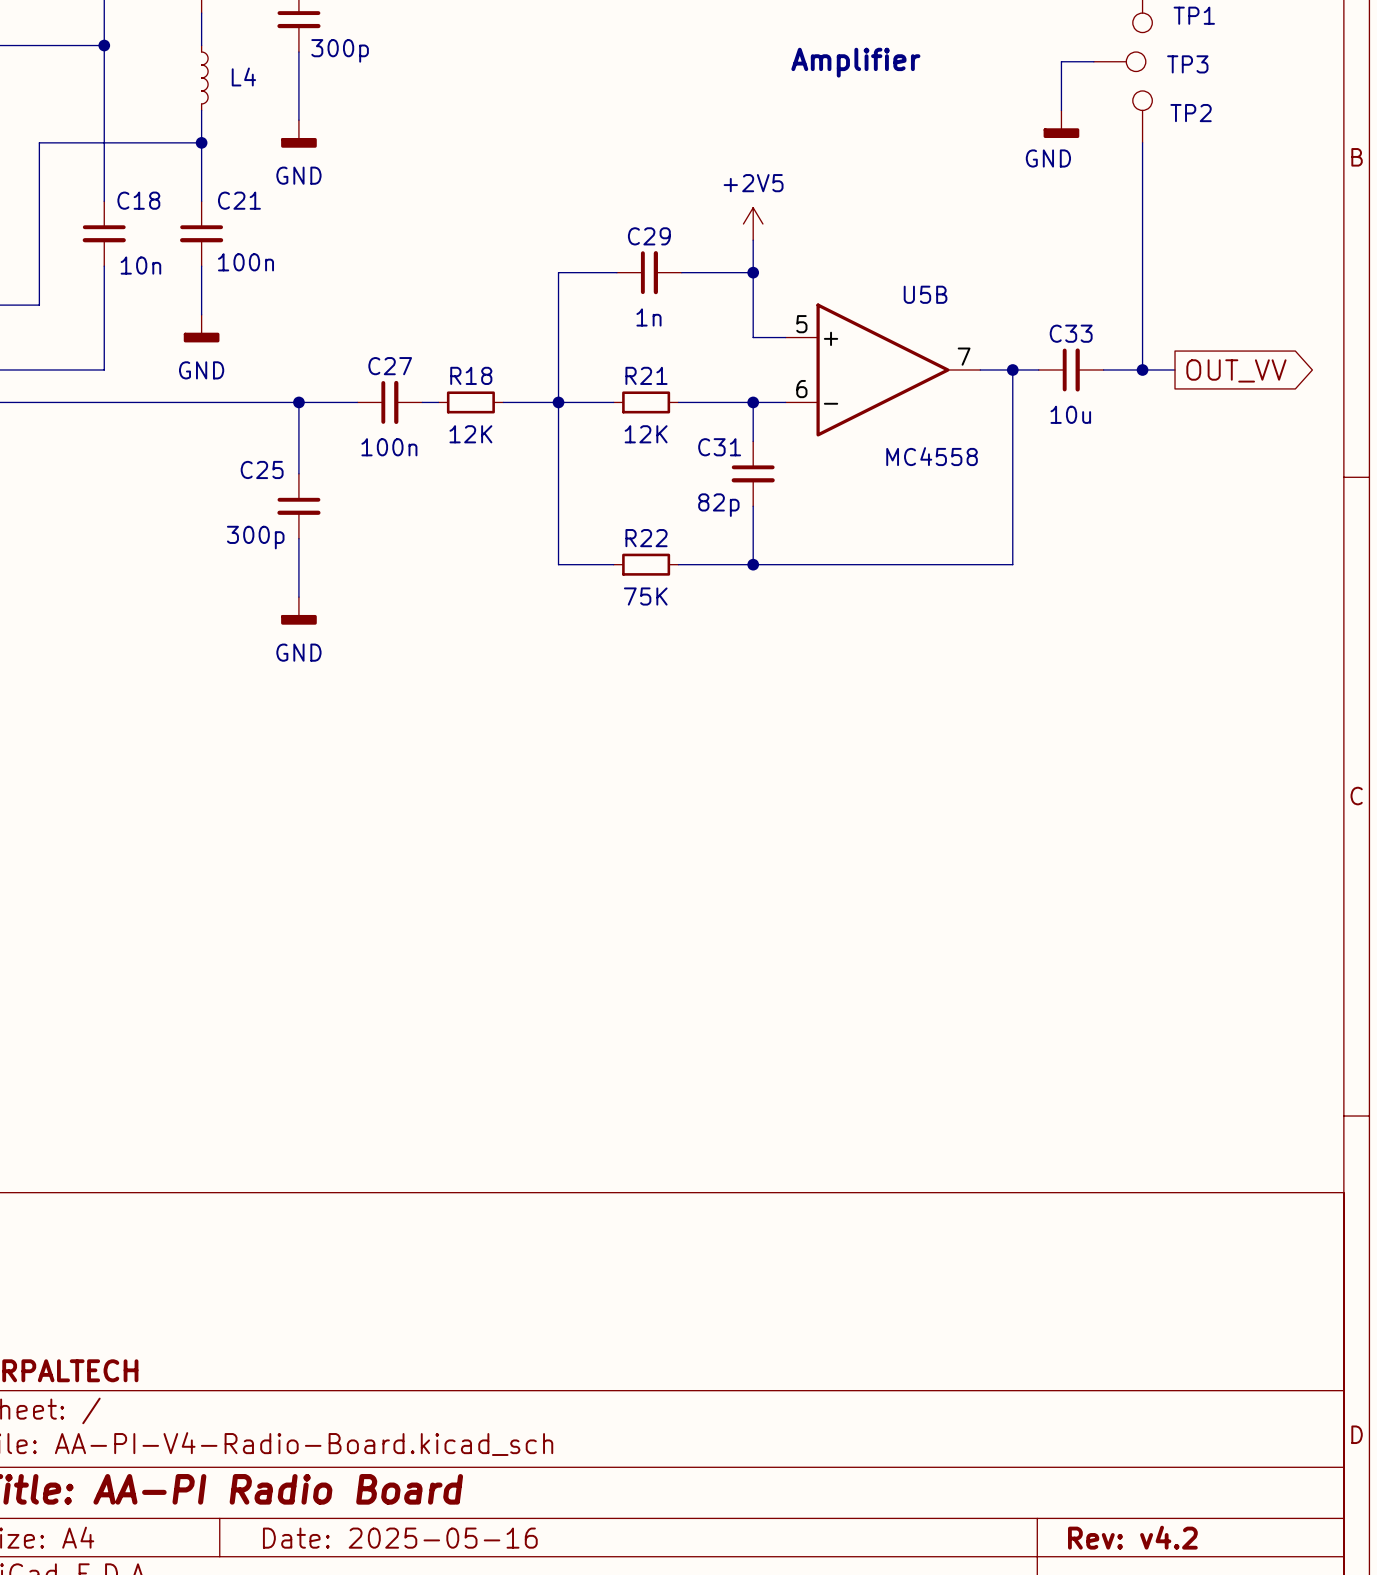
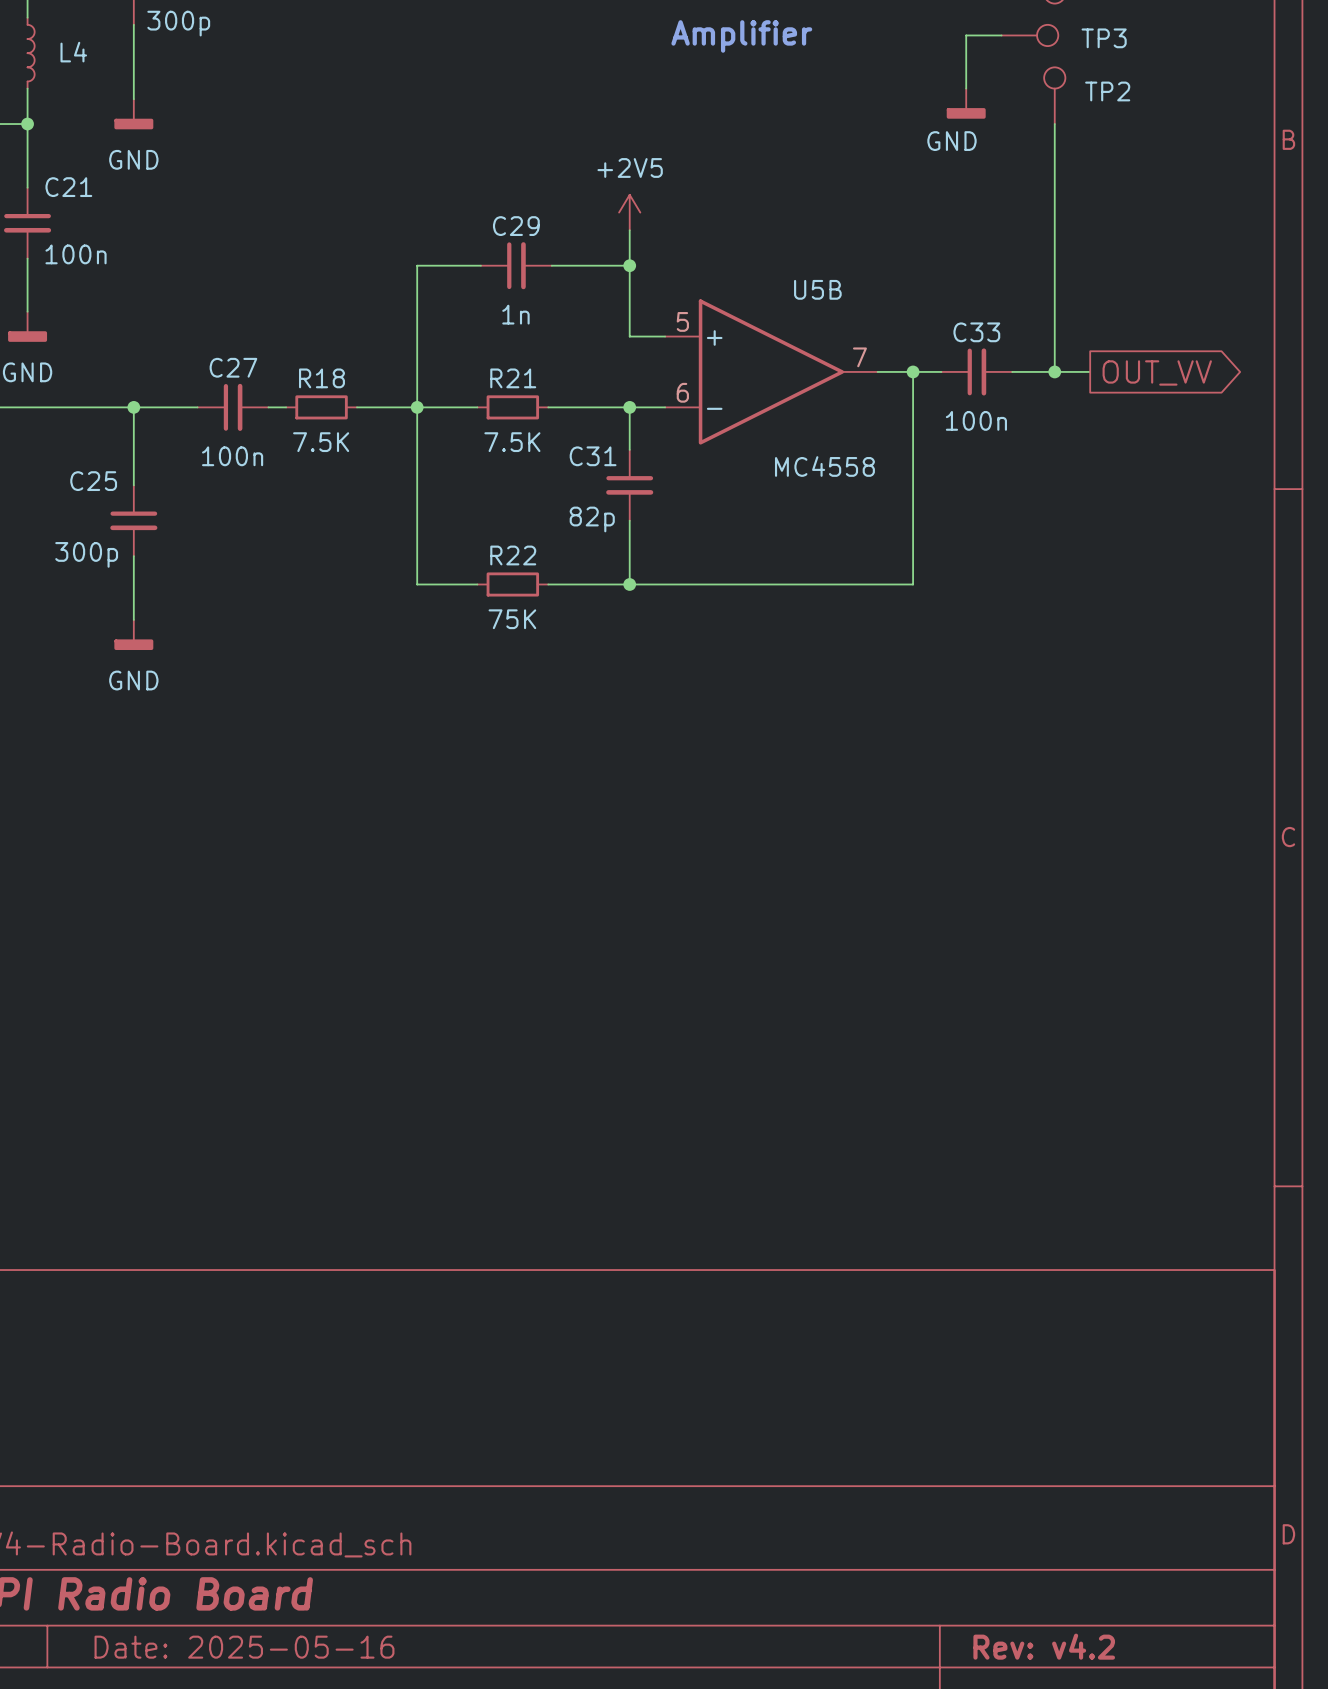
C33 value: 10u (1070, 414) -> 100n (976, 420)
R18 value: 12K (470, 434) -> 7.5K (321, 442)
R21 value: 12K (646, 434) -> 7.5K (512, 442)

